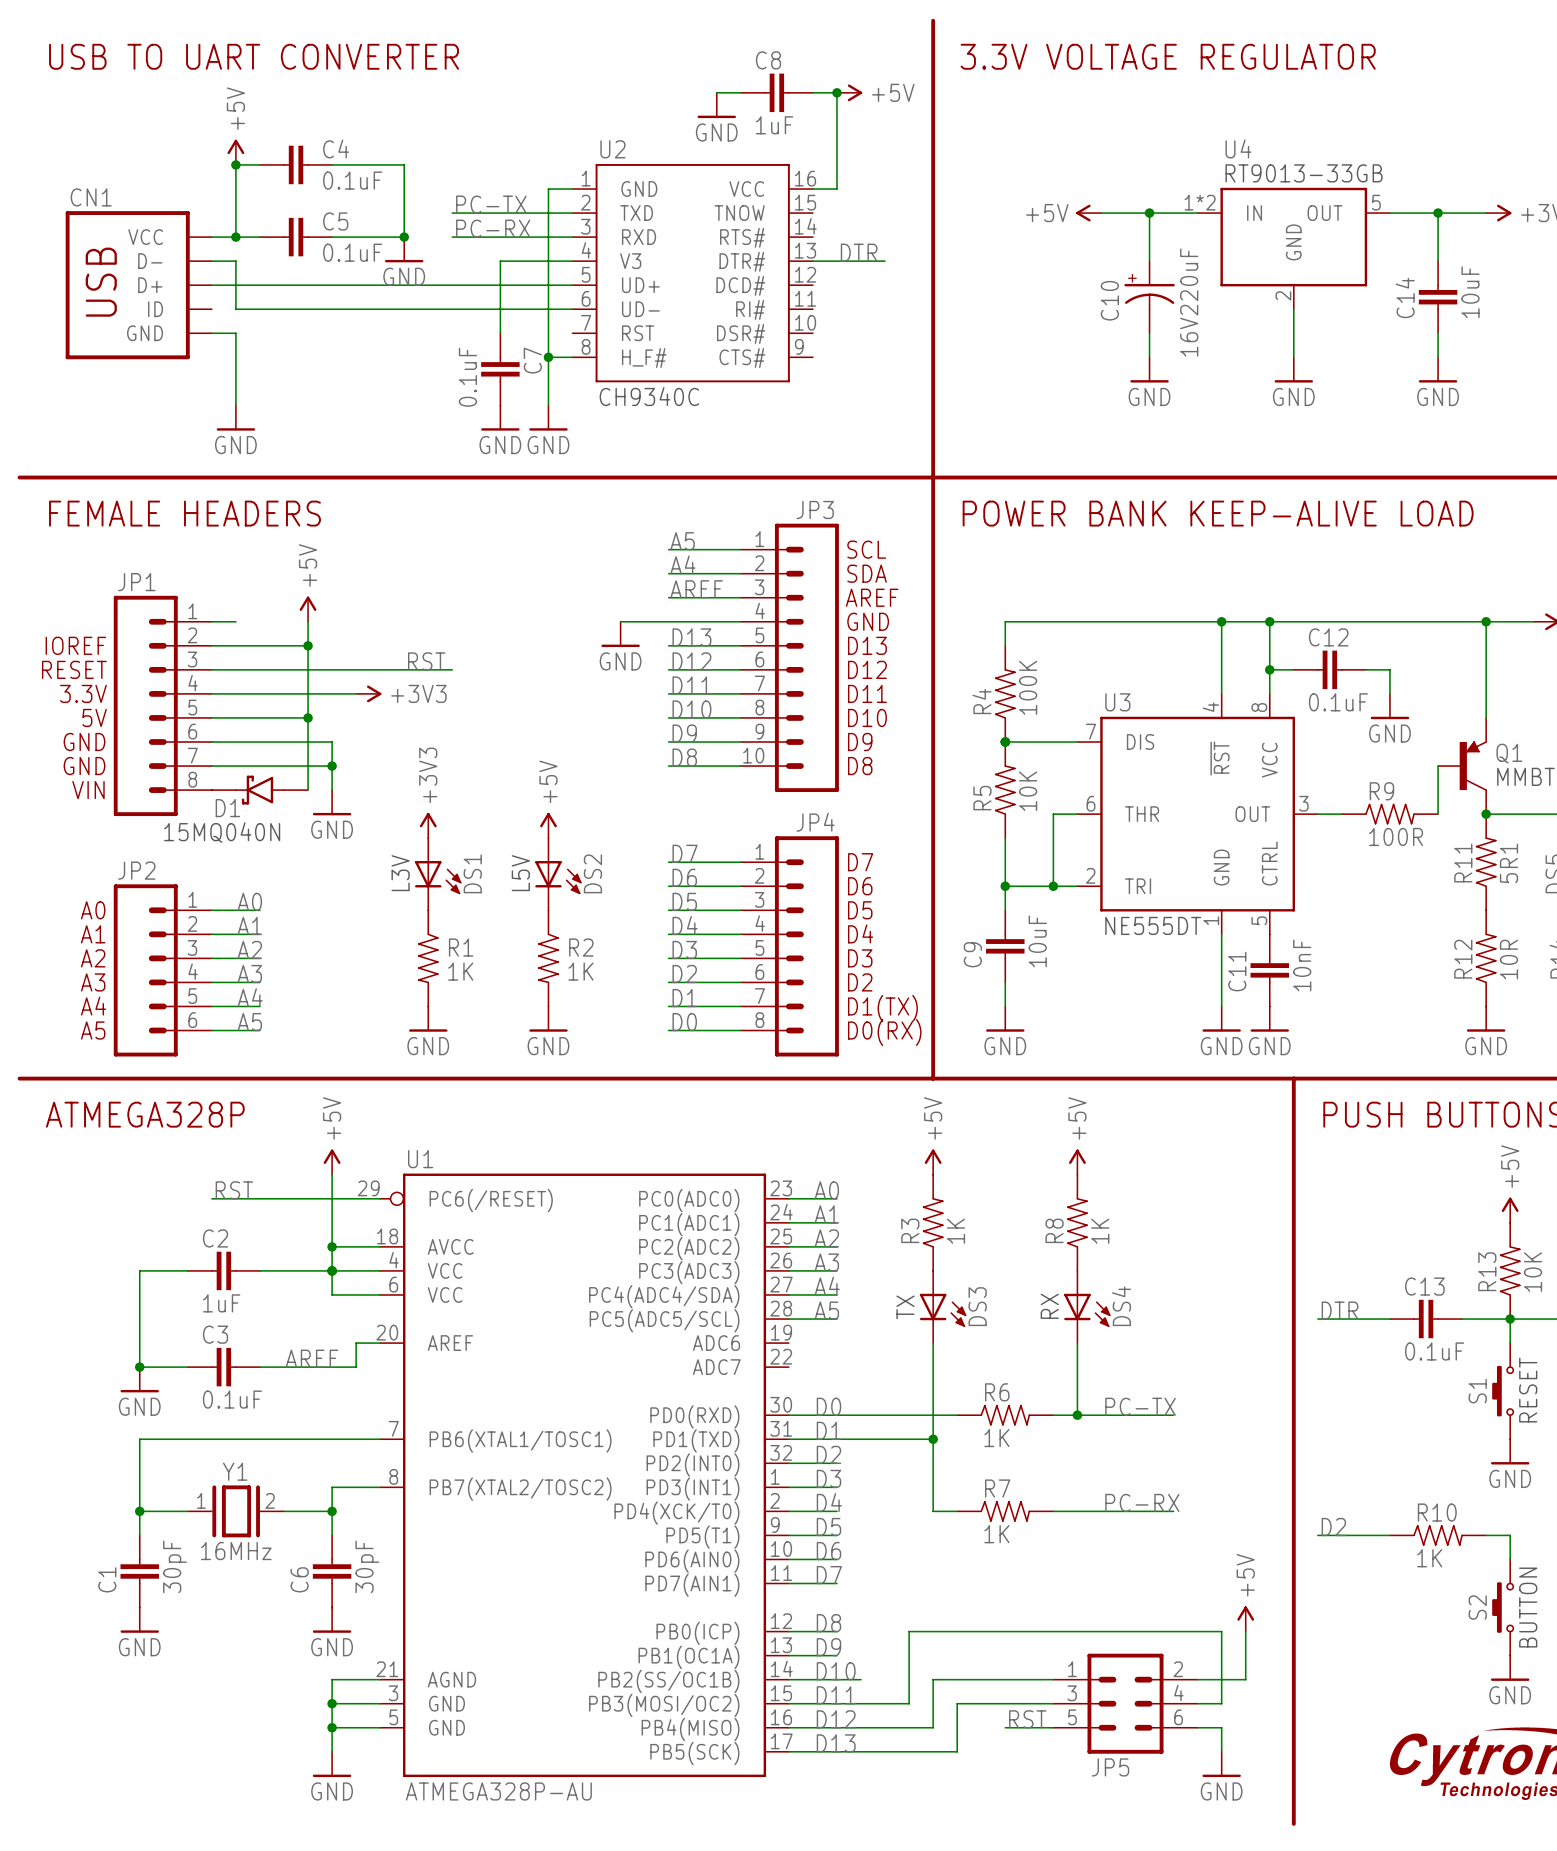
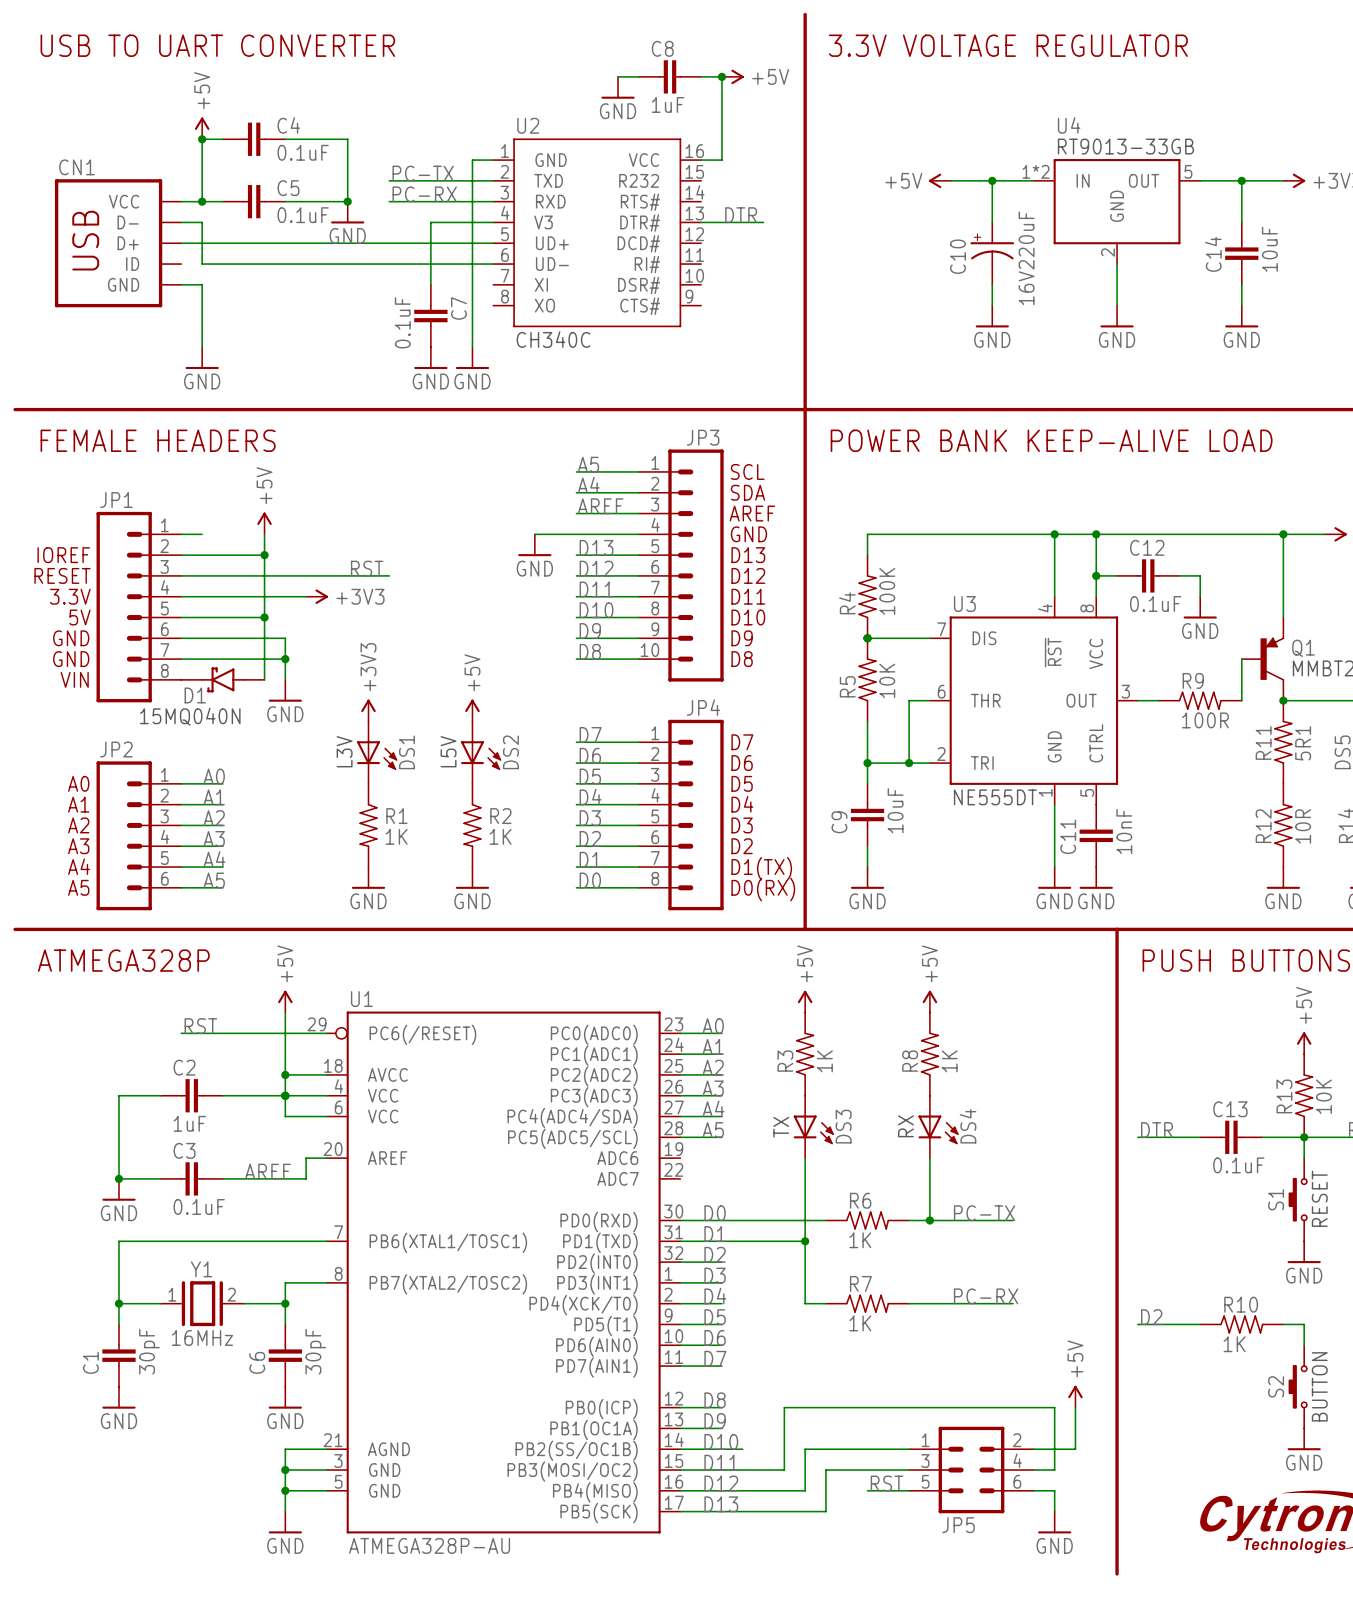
U2 pin name: TNOW (739, 213) -> R232 (639, 180)
U2 pin name: RST (638, 333) -> XI (541, 284)
wire: (548, 357) (572, 357) -> none
junction: (548, 357) -> none
U2 pin name: H_F# (644, 357) -> XO (544, 305)
U2 text: CH9340C (649, 396) -> CH340C (553, 339)

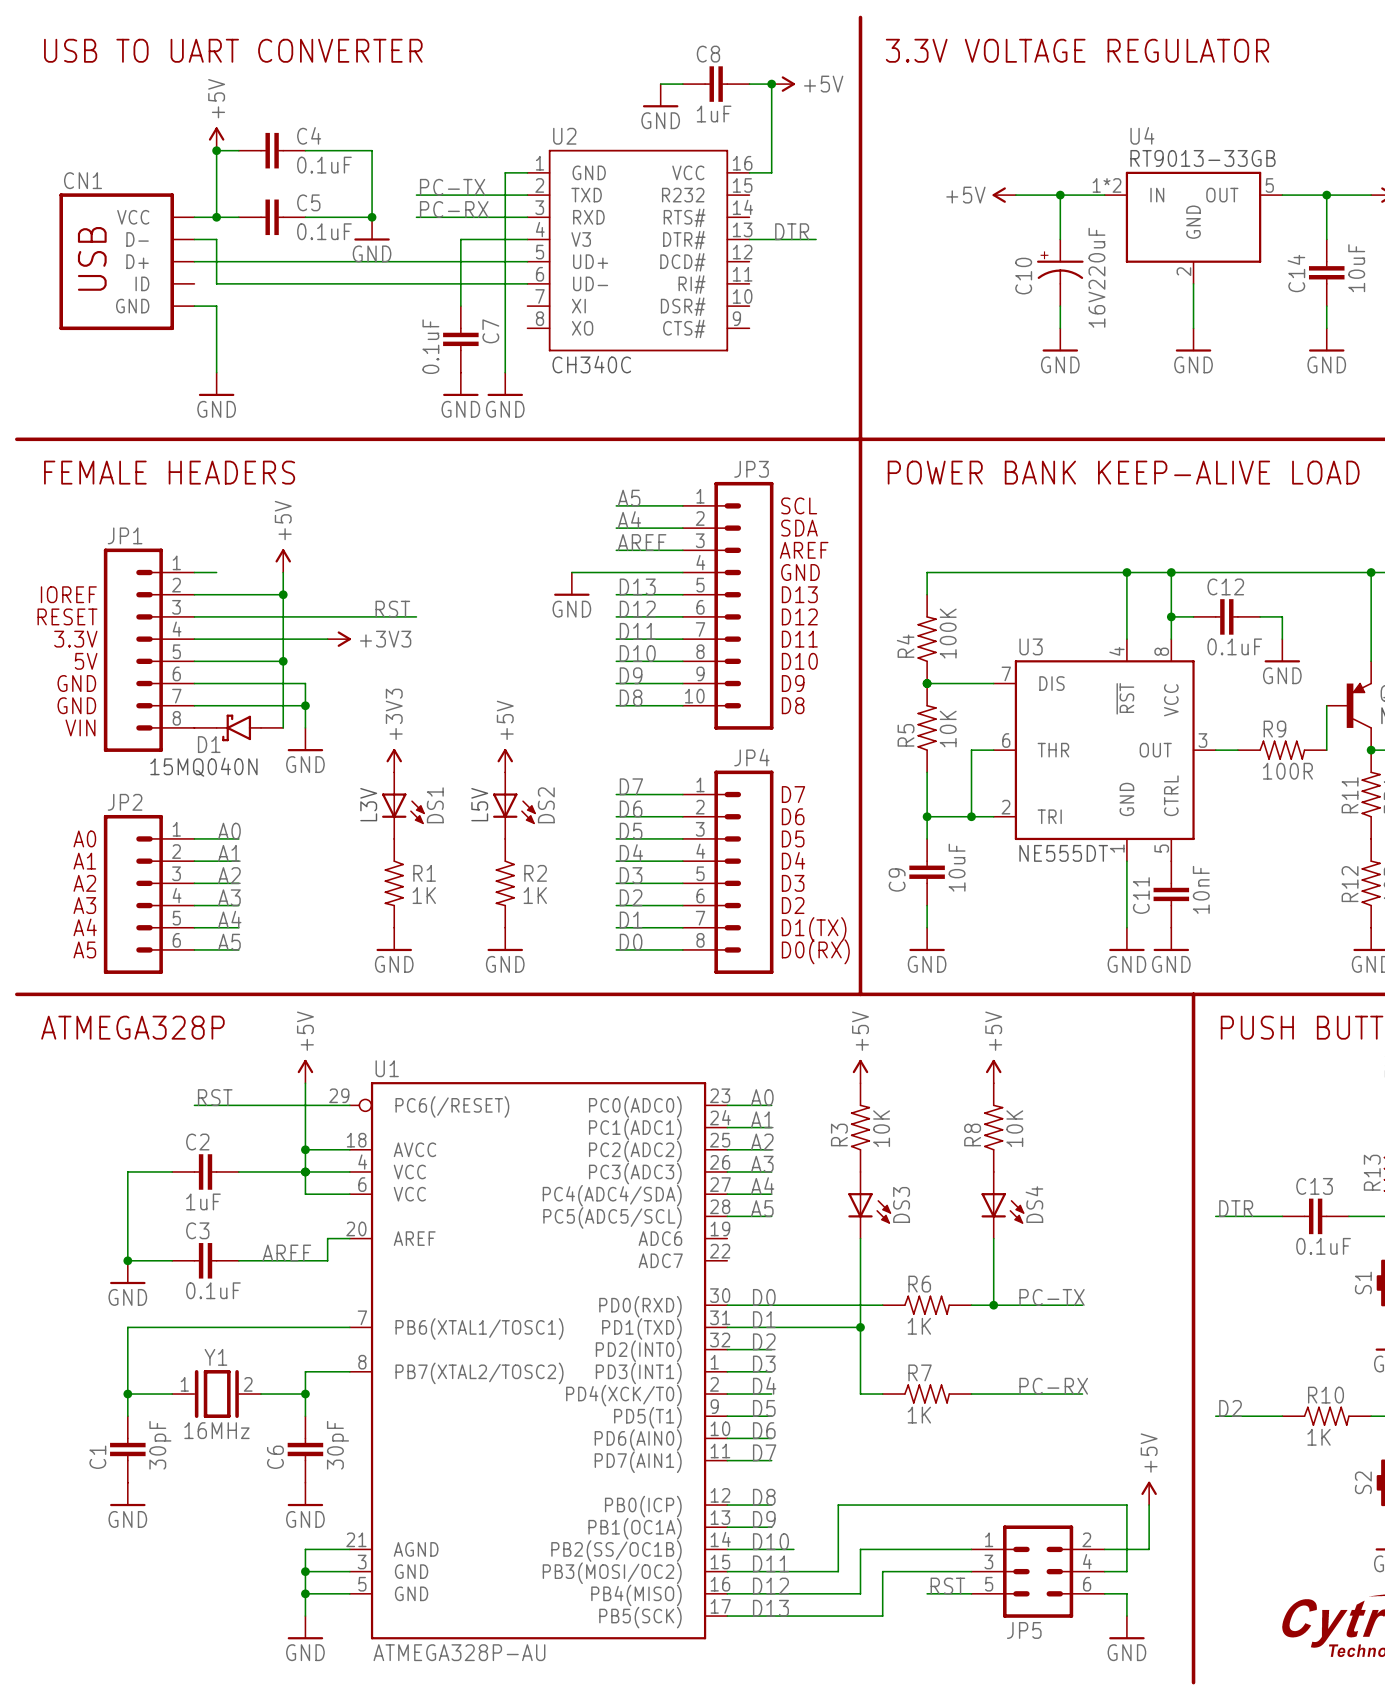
R3 value: 1K (824, 1061) -> 10K (881, 1128)
R8 value: 1K (949, 1061) -> 10K (1014, 1128)
DS4 text: RX (905, 1126) -> none
DS3 text: TX (781, 1127) -> none

